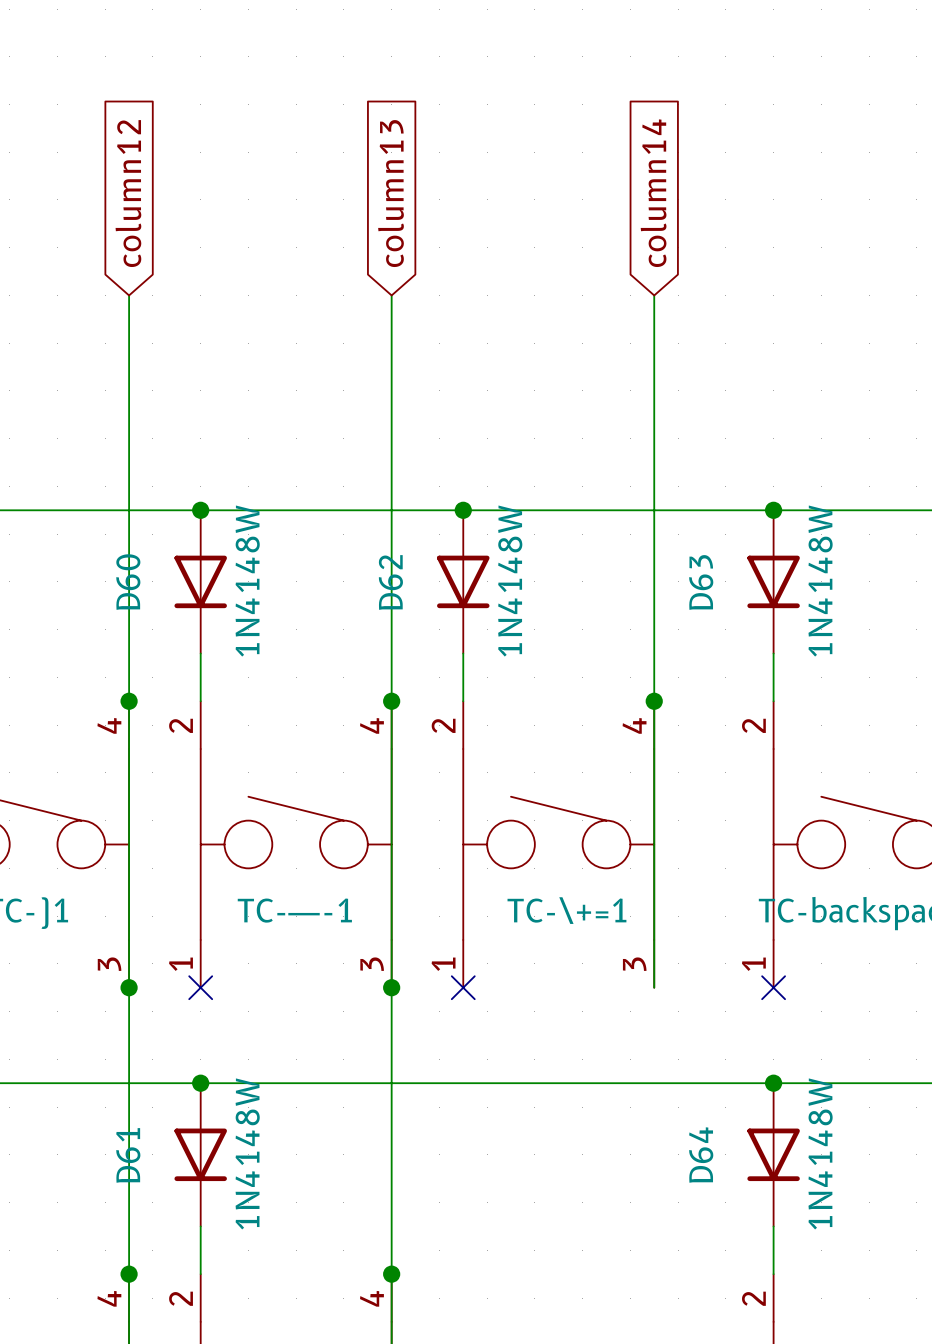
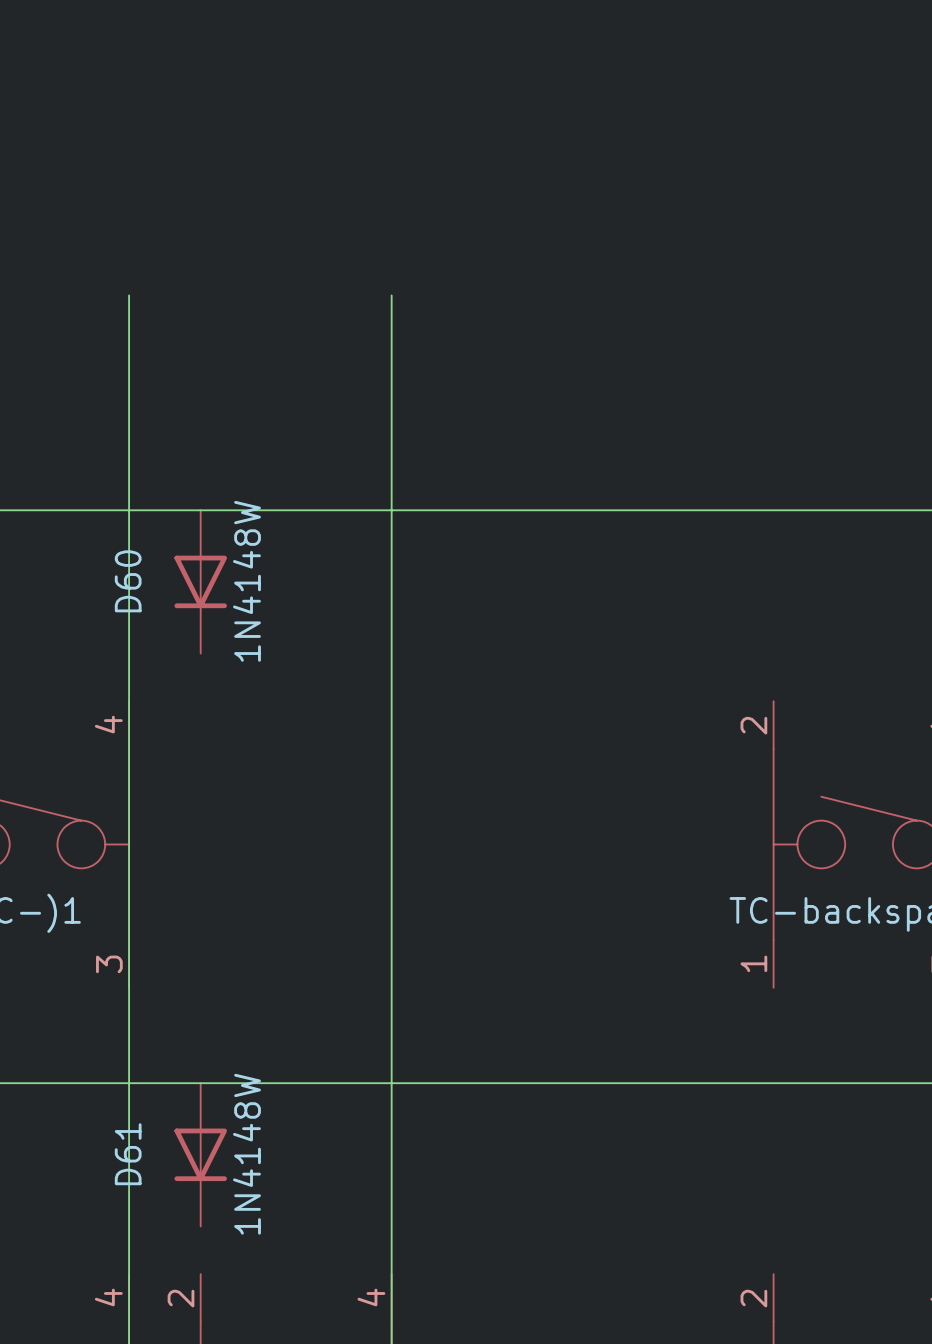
global label: column12 (128, 193) -> none
global label: column13 (391, 193) -> none
global label: column14 (653, 193) -> none
wire: (654, 295) (654, 987) -> none
junction: (200, 510) -> none
junction: (463, 510) -> none
junction: (773, 510) -> none
D62: 1N4148W (463, 581) -> none
D63: 1N4148W (773, 581) -> none
wire: (200, 653) (200, 701) -> none
wire: (463, 653) (463, 701) -> none
wire: (773, 653) (773, 701) -> none
junction: (129, 701) -> none
junction: (391, 701) -> none
junction: (654, 701) -> none
TC-—-1: (296, 844) -> none
TC-\+=1: (558, 844) -> none
junction: (129, 987) -> none
no-connect mark: (200, 987) -> none
junction: (391, 987) -> none
no-connect mark: (463, 987) -> none
no-connect mark: (773, 987) -> none
junction: (200, 1083) -> none
junction: (773, 1083) -> none
D64: 1N4148W (773, 1154) -> none
wire: (200, 1226) (200, 1274) -> none
wire: (773, 1226) (773, 1274) -> none
junction: (129, 1274) -> none
junction: (391, 1274) -> none

